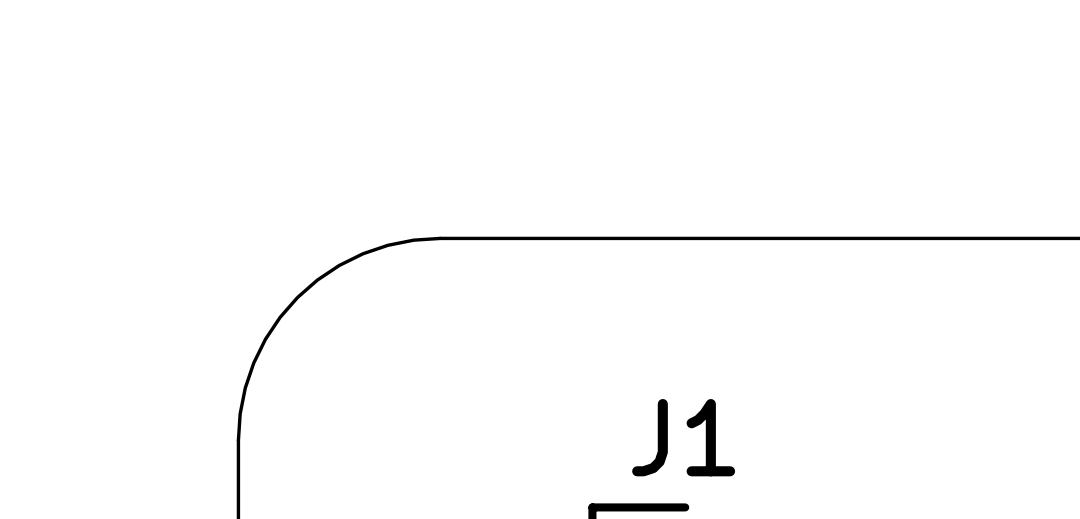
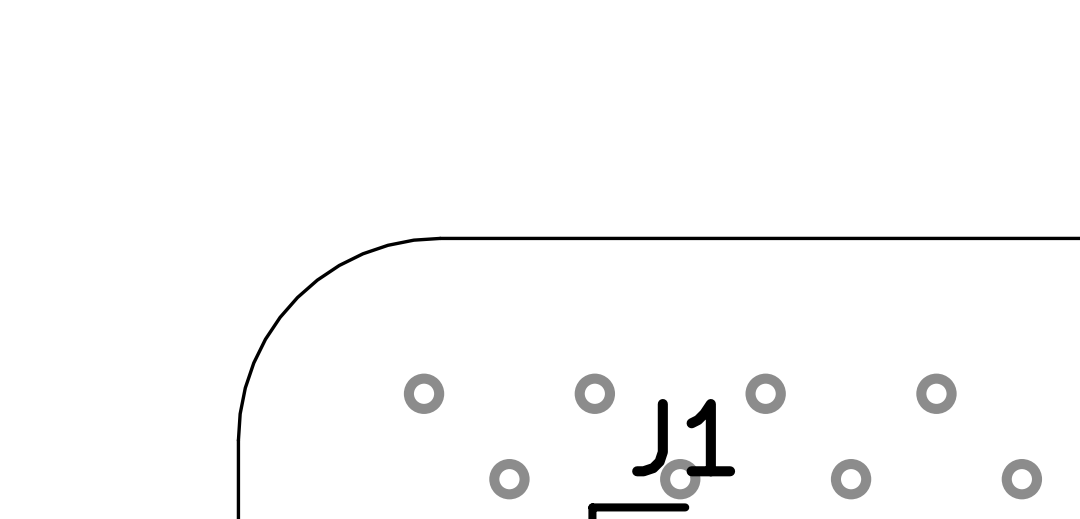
via: none -> (424, 393)
via: none -> (594, 393)
via: none -> (765, 393)
via: none -> (936, 393)
via: none -> (509, 479)
via: none -> (680, 479)
via: none -> (851, 479)
via: none -> (1021, 479)

